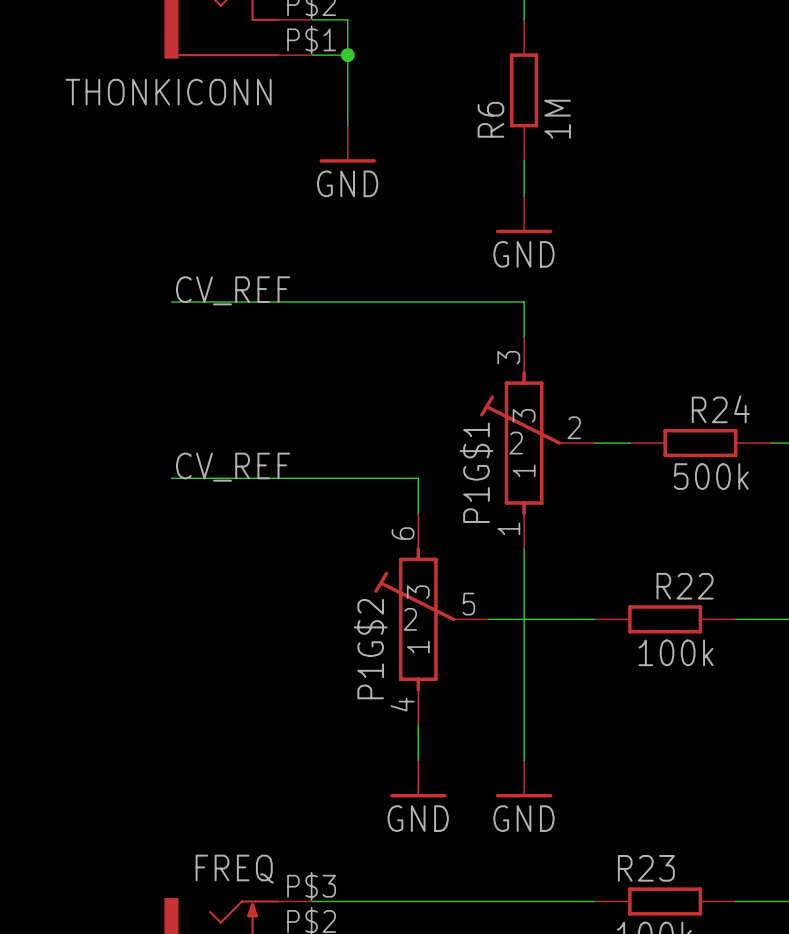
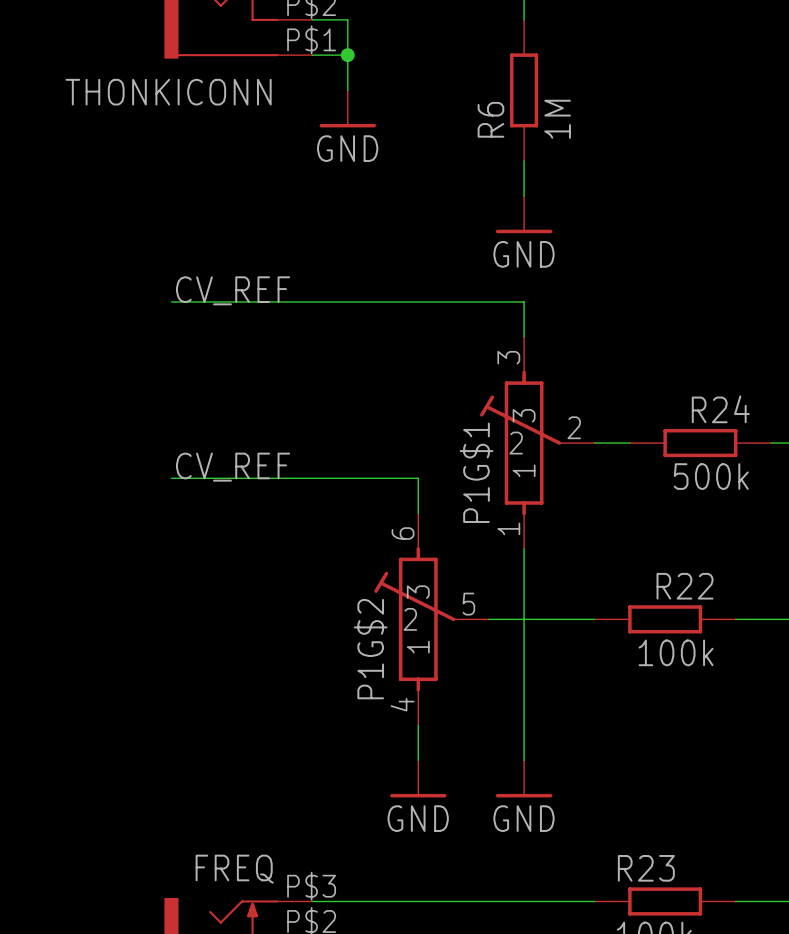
power symbol position: GND (347, 144) -> GND (347, 108)

